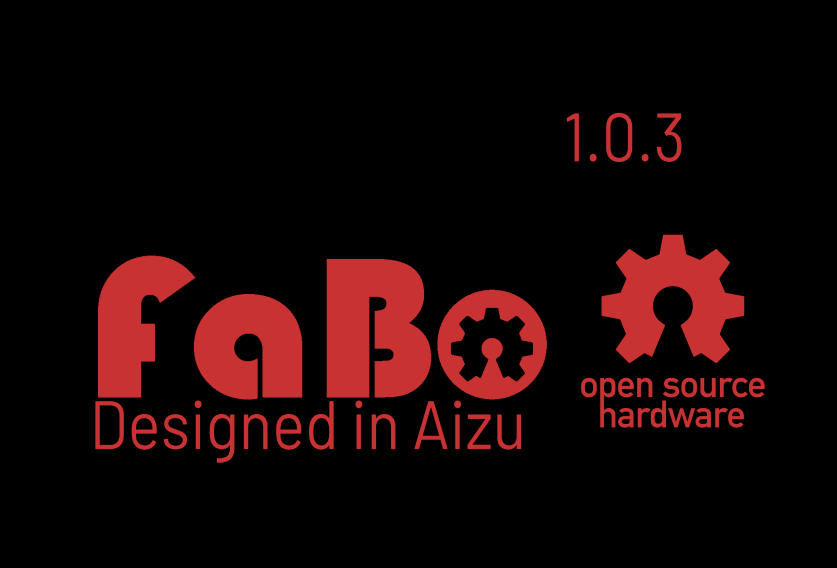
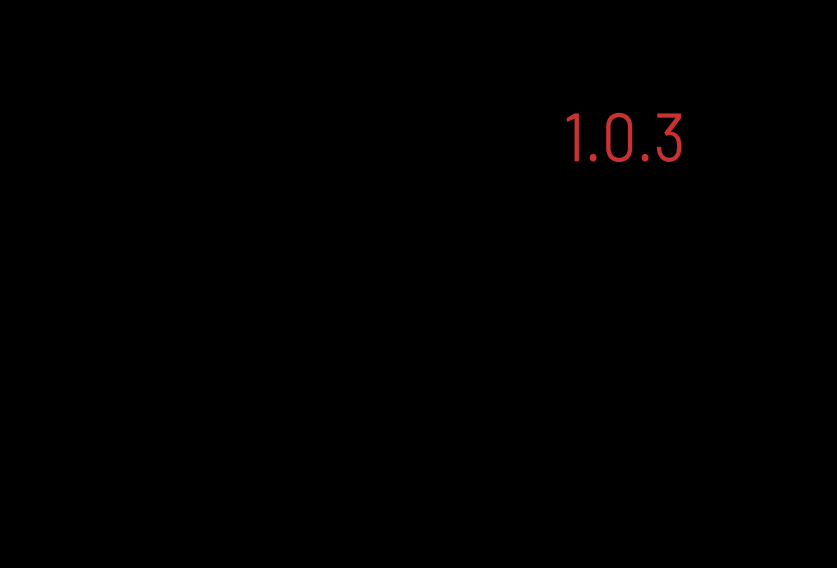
part: (322, 327) -> none
part: (672, 331) -> none

